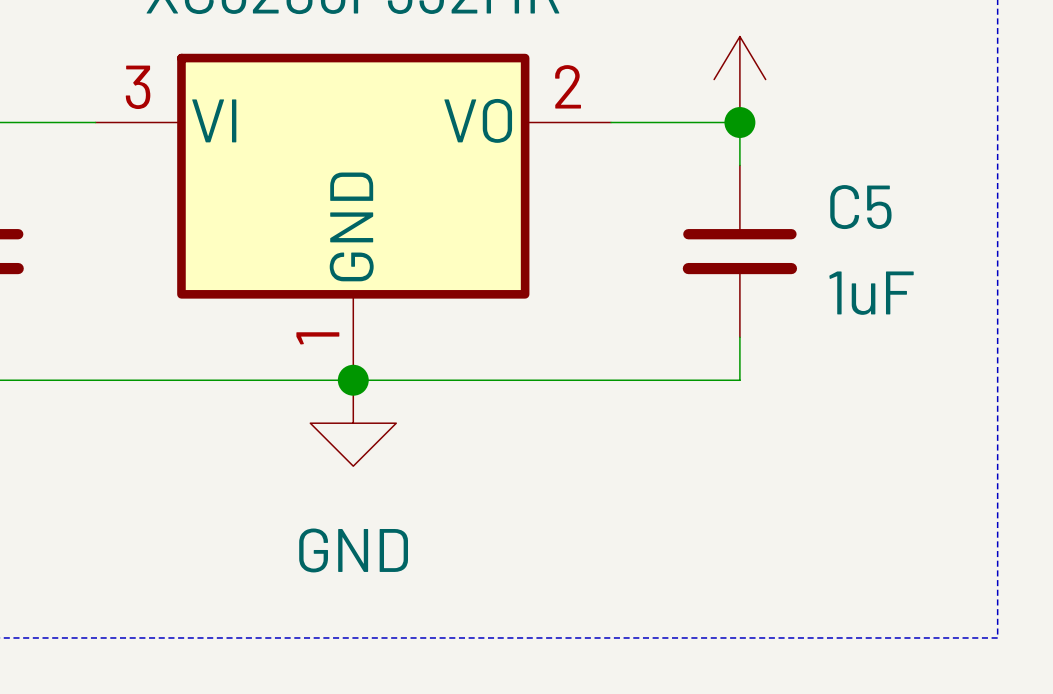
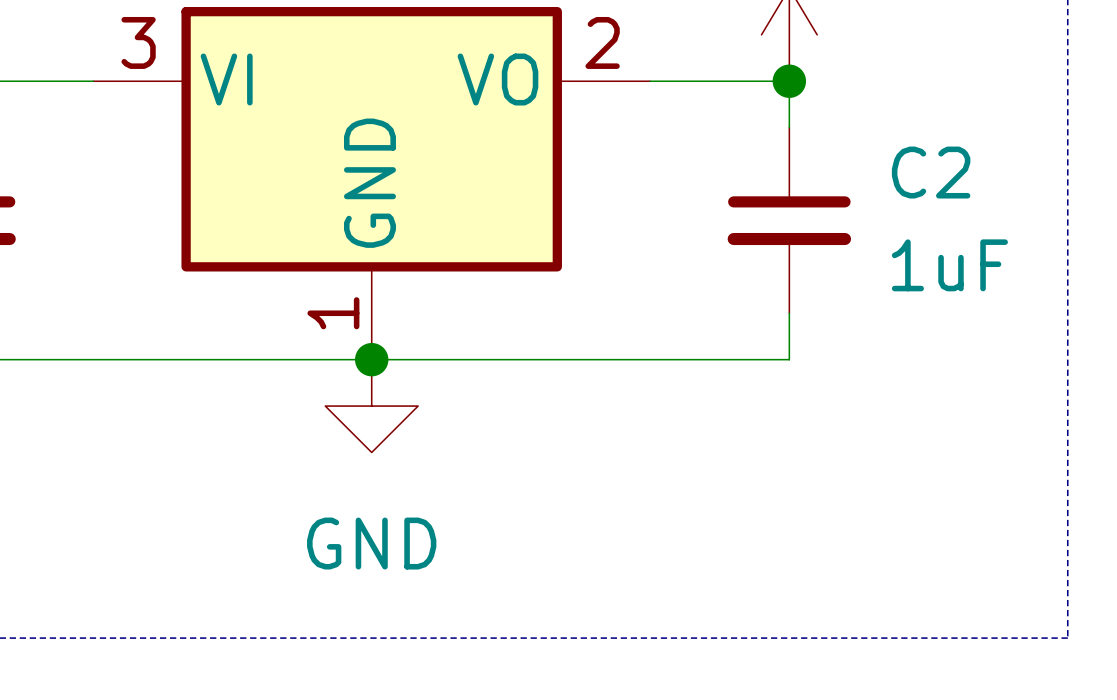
C5 name: C5 (860, 207) -> C2 (931, 172)

